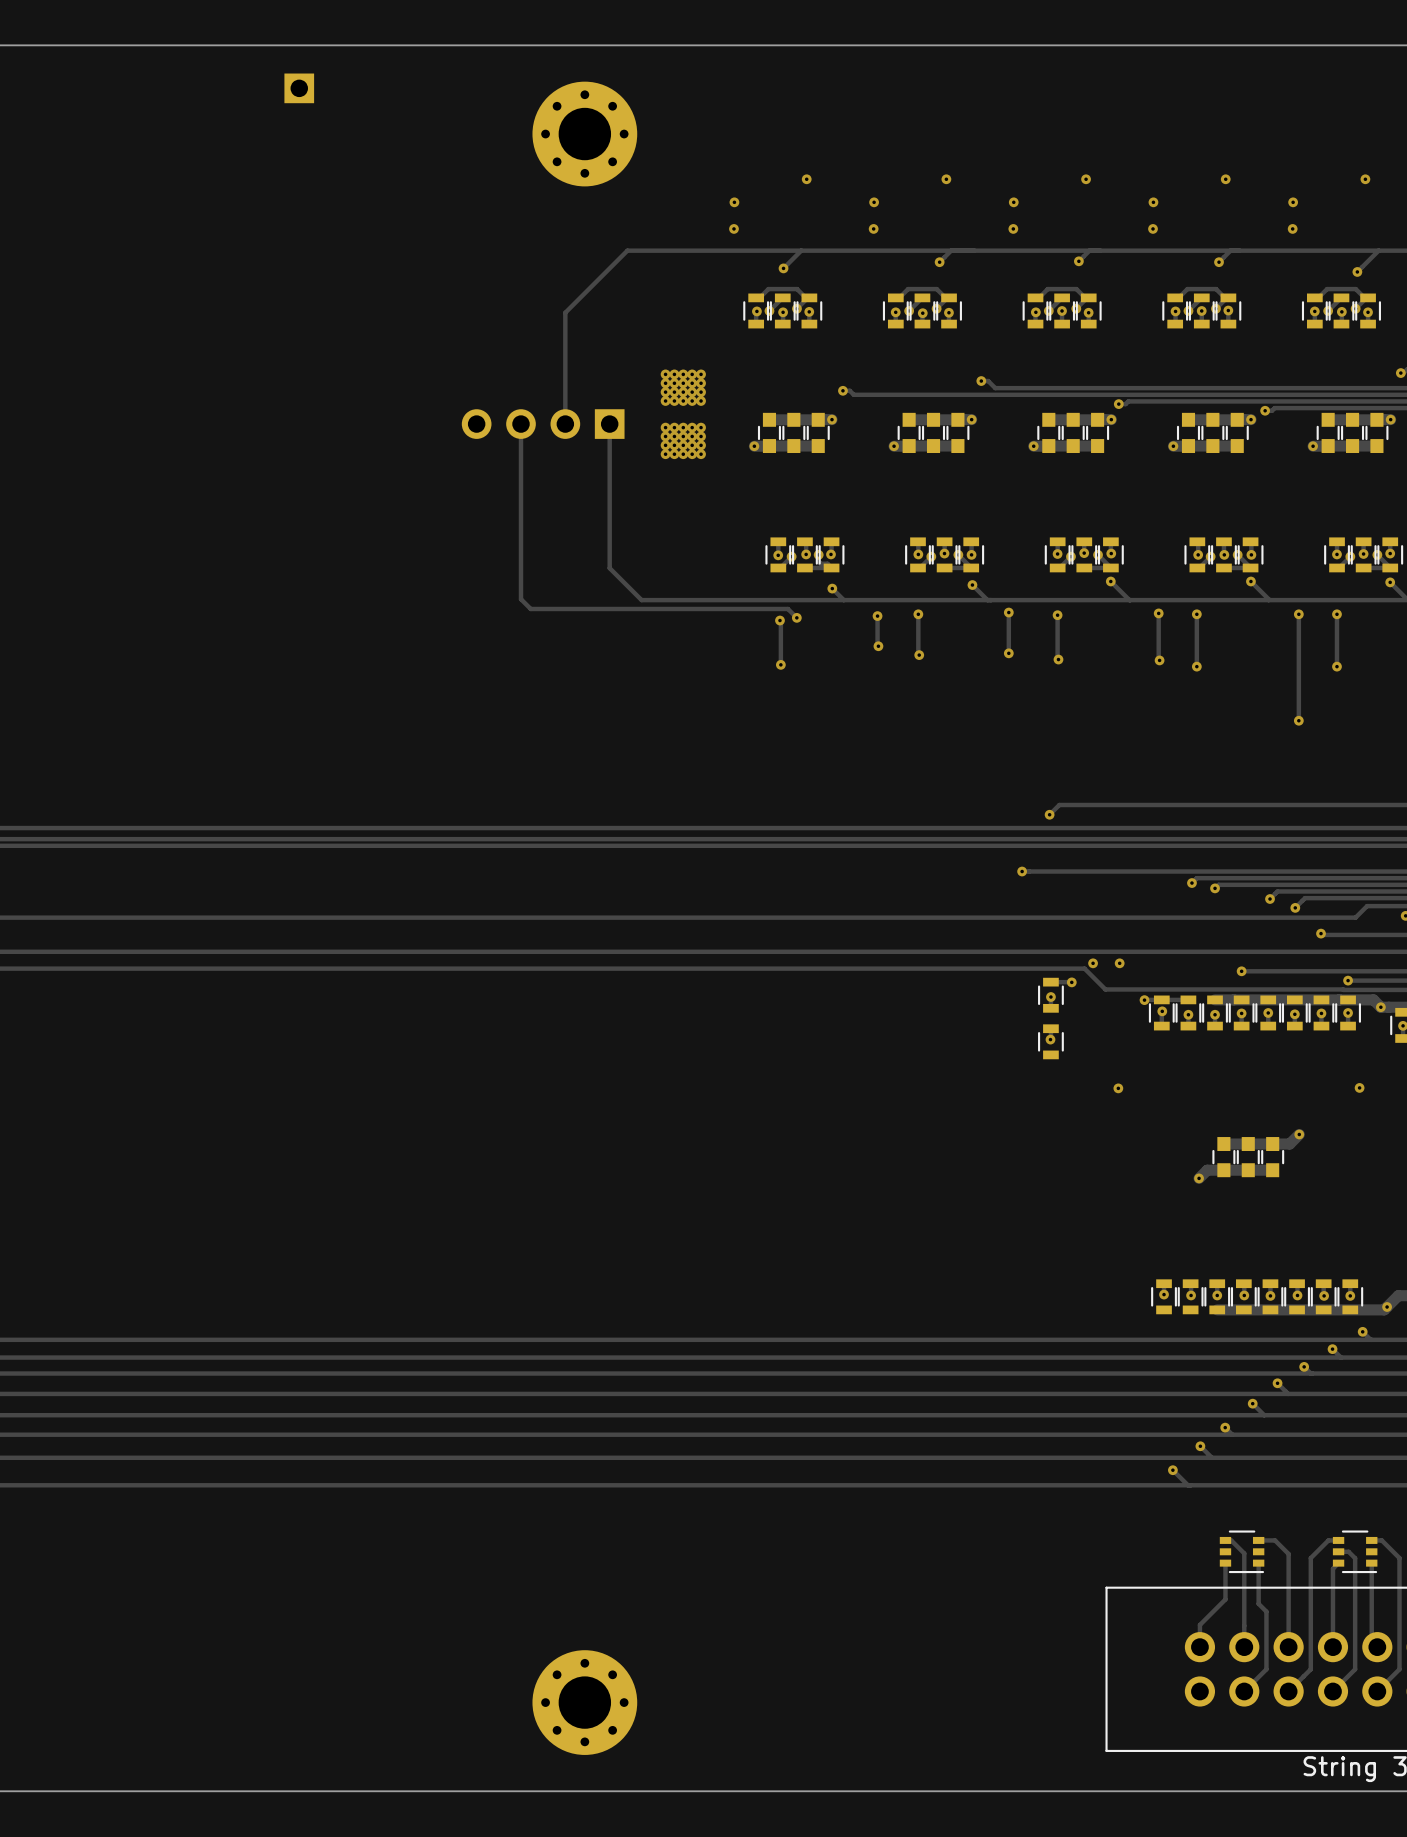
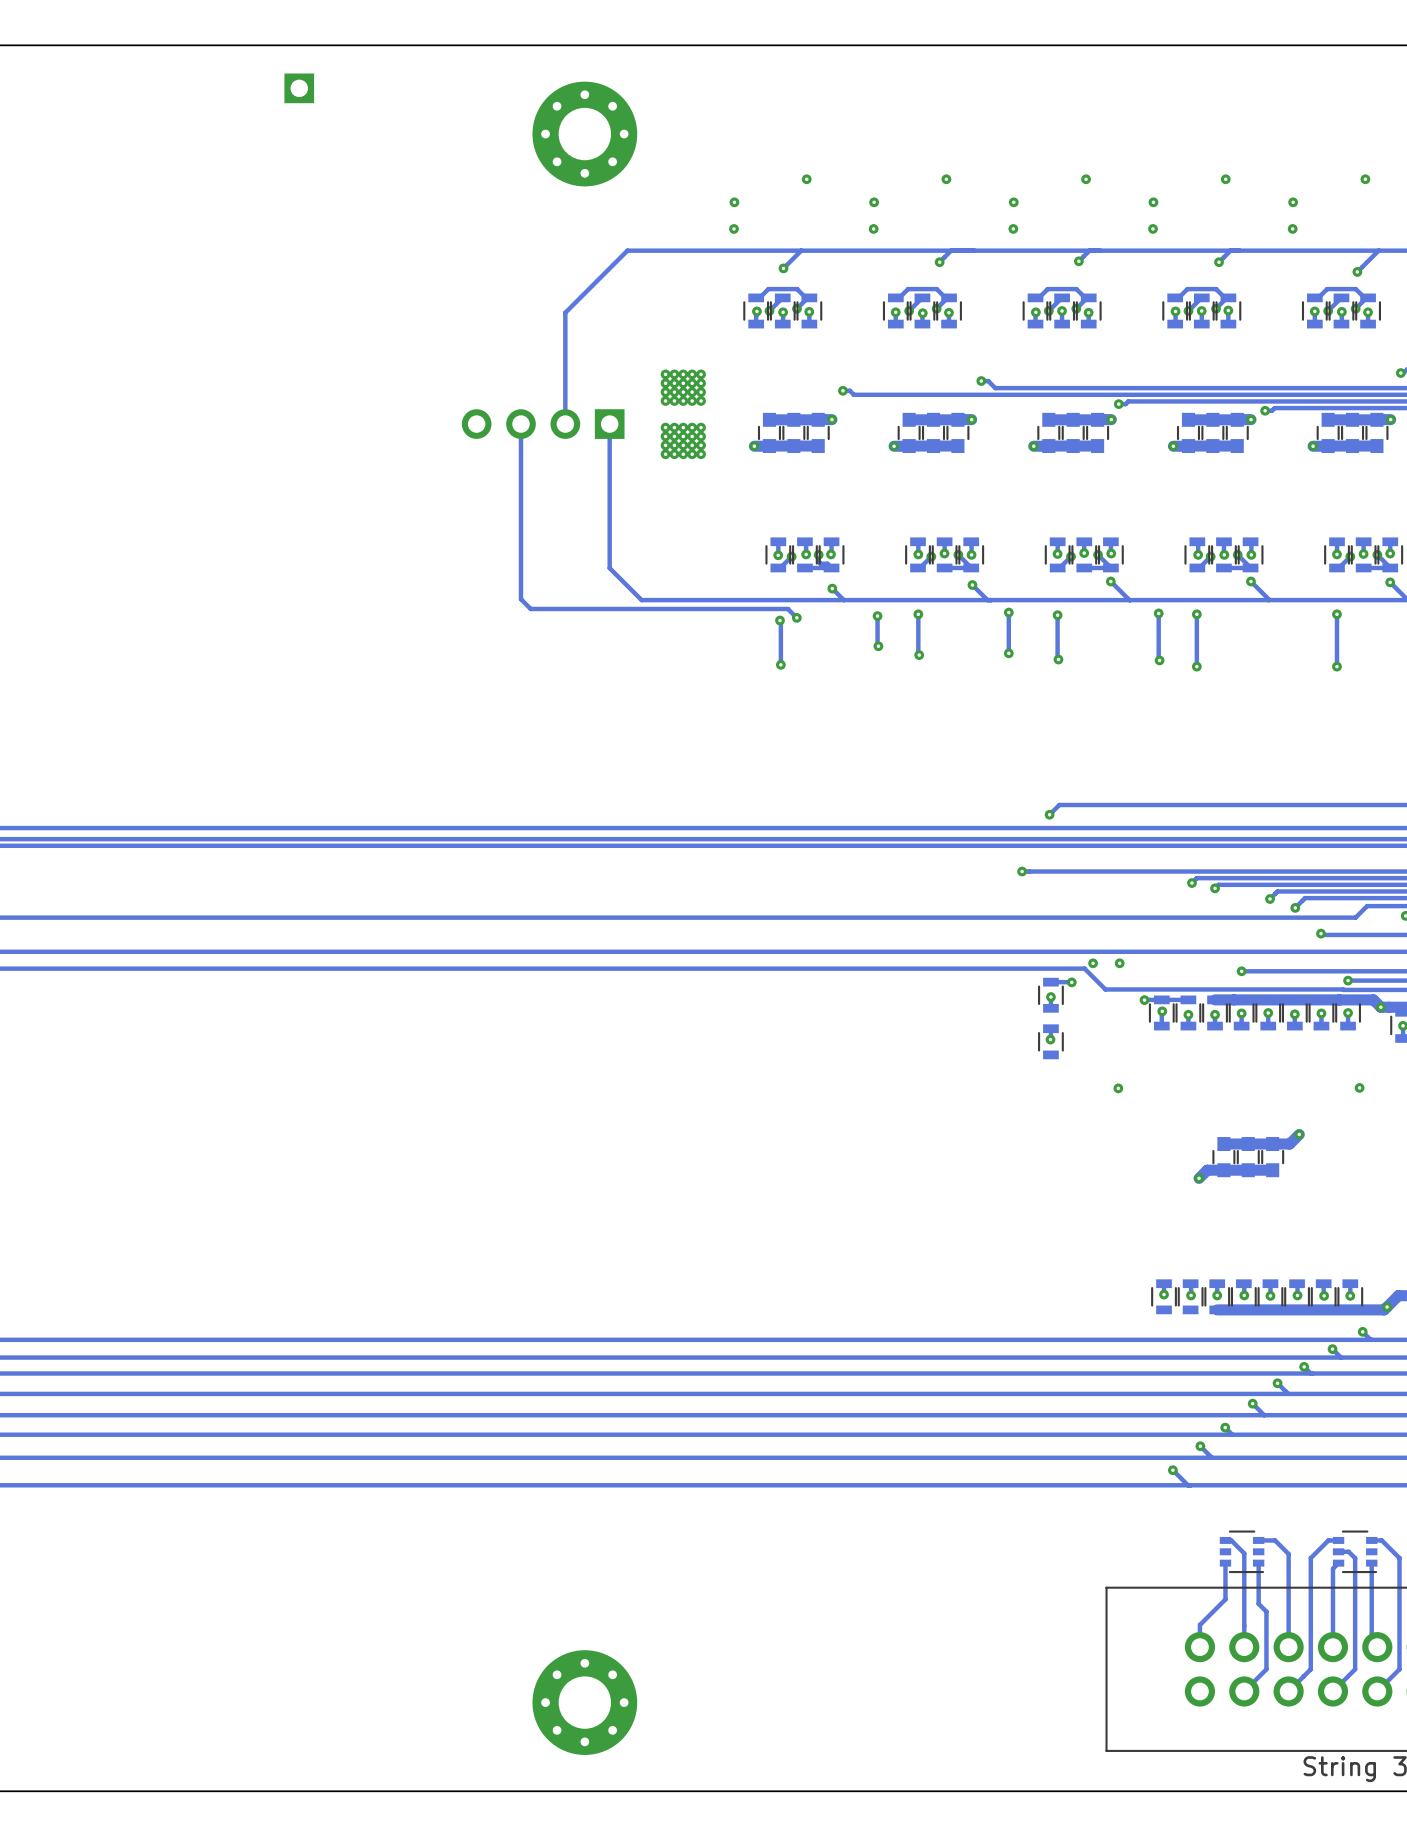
track: (1298, 614) (1298, 720) -> none
via: (1298, 614) -> none
via: (1298, 720) -> none

